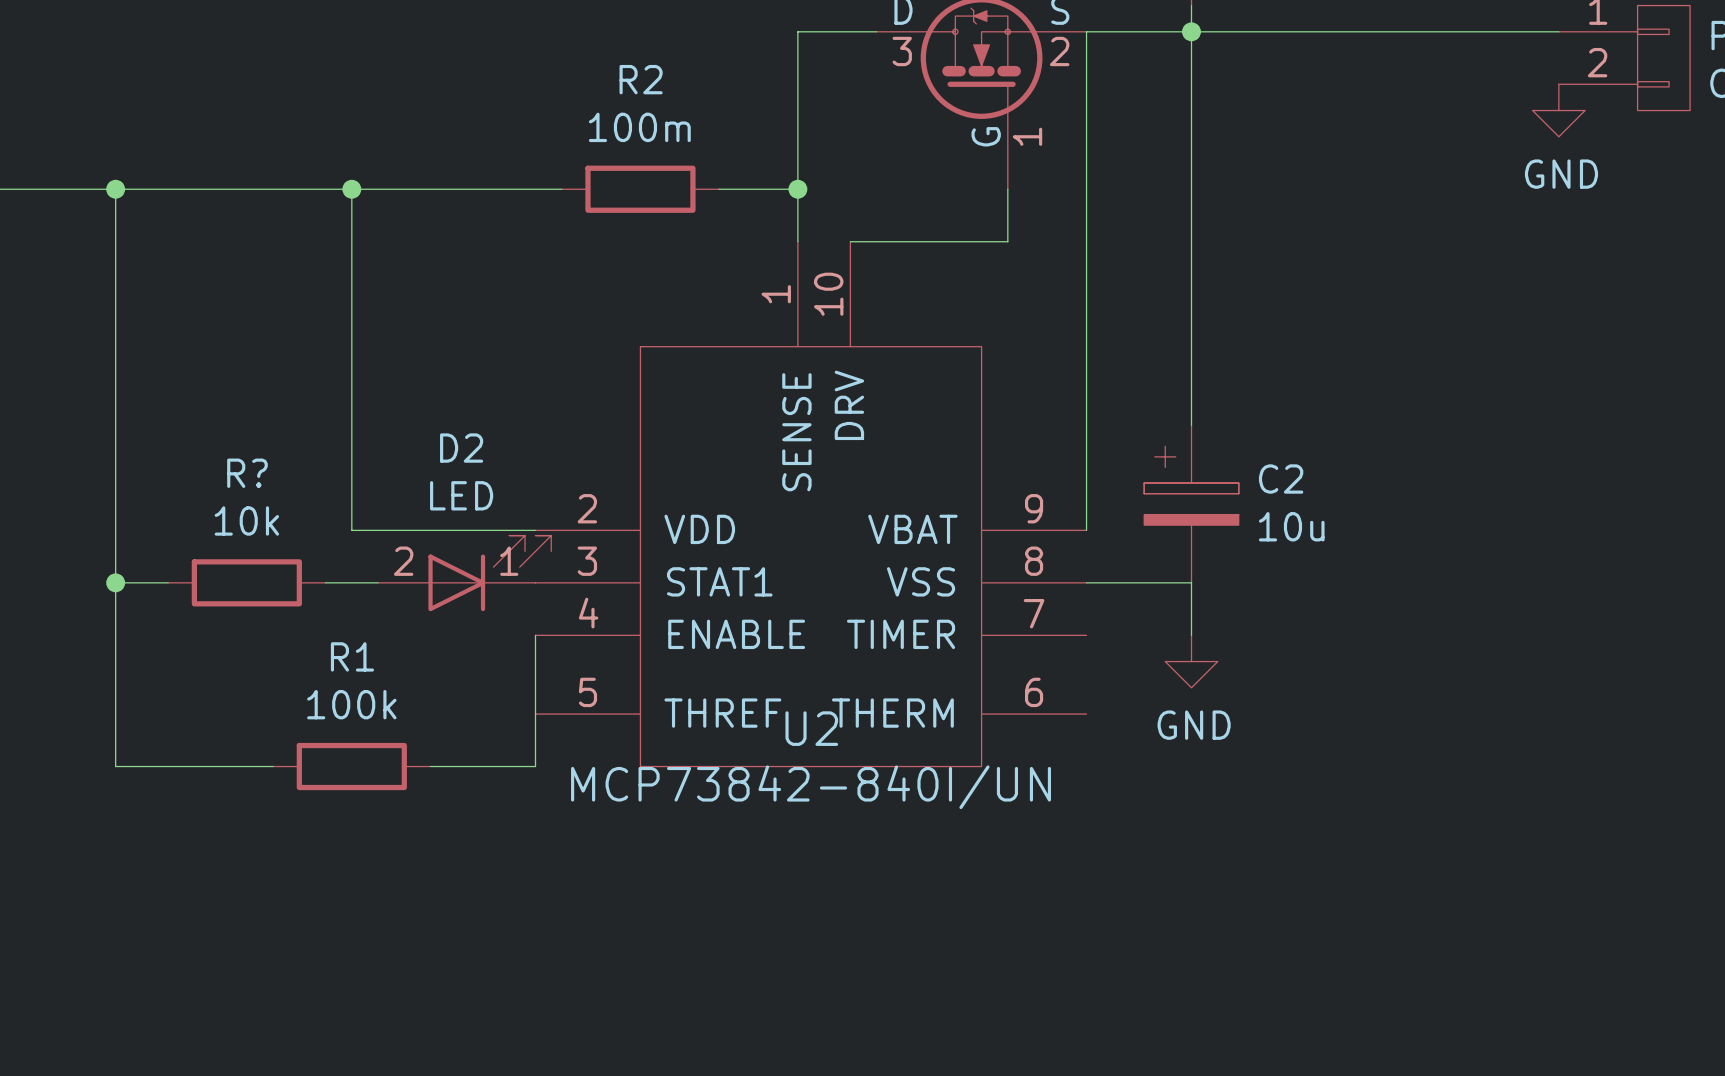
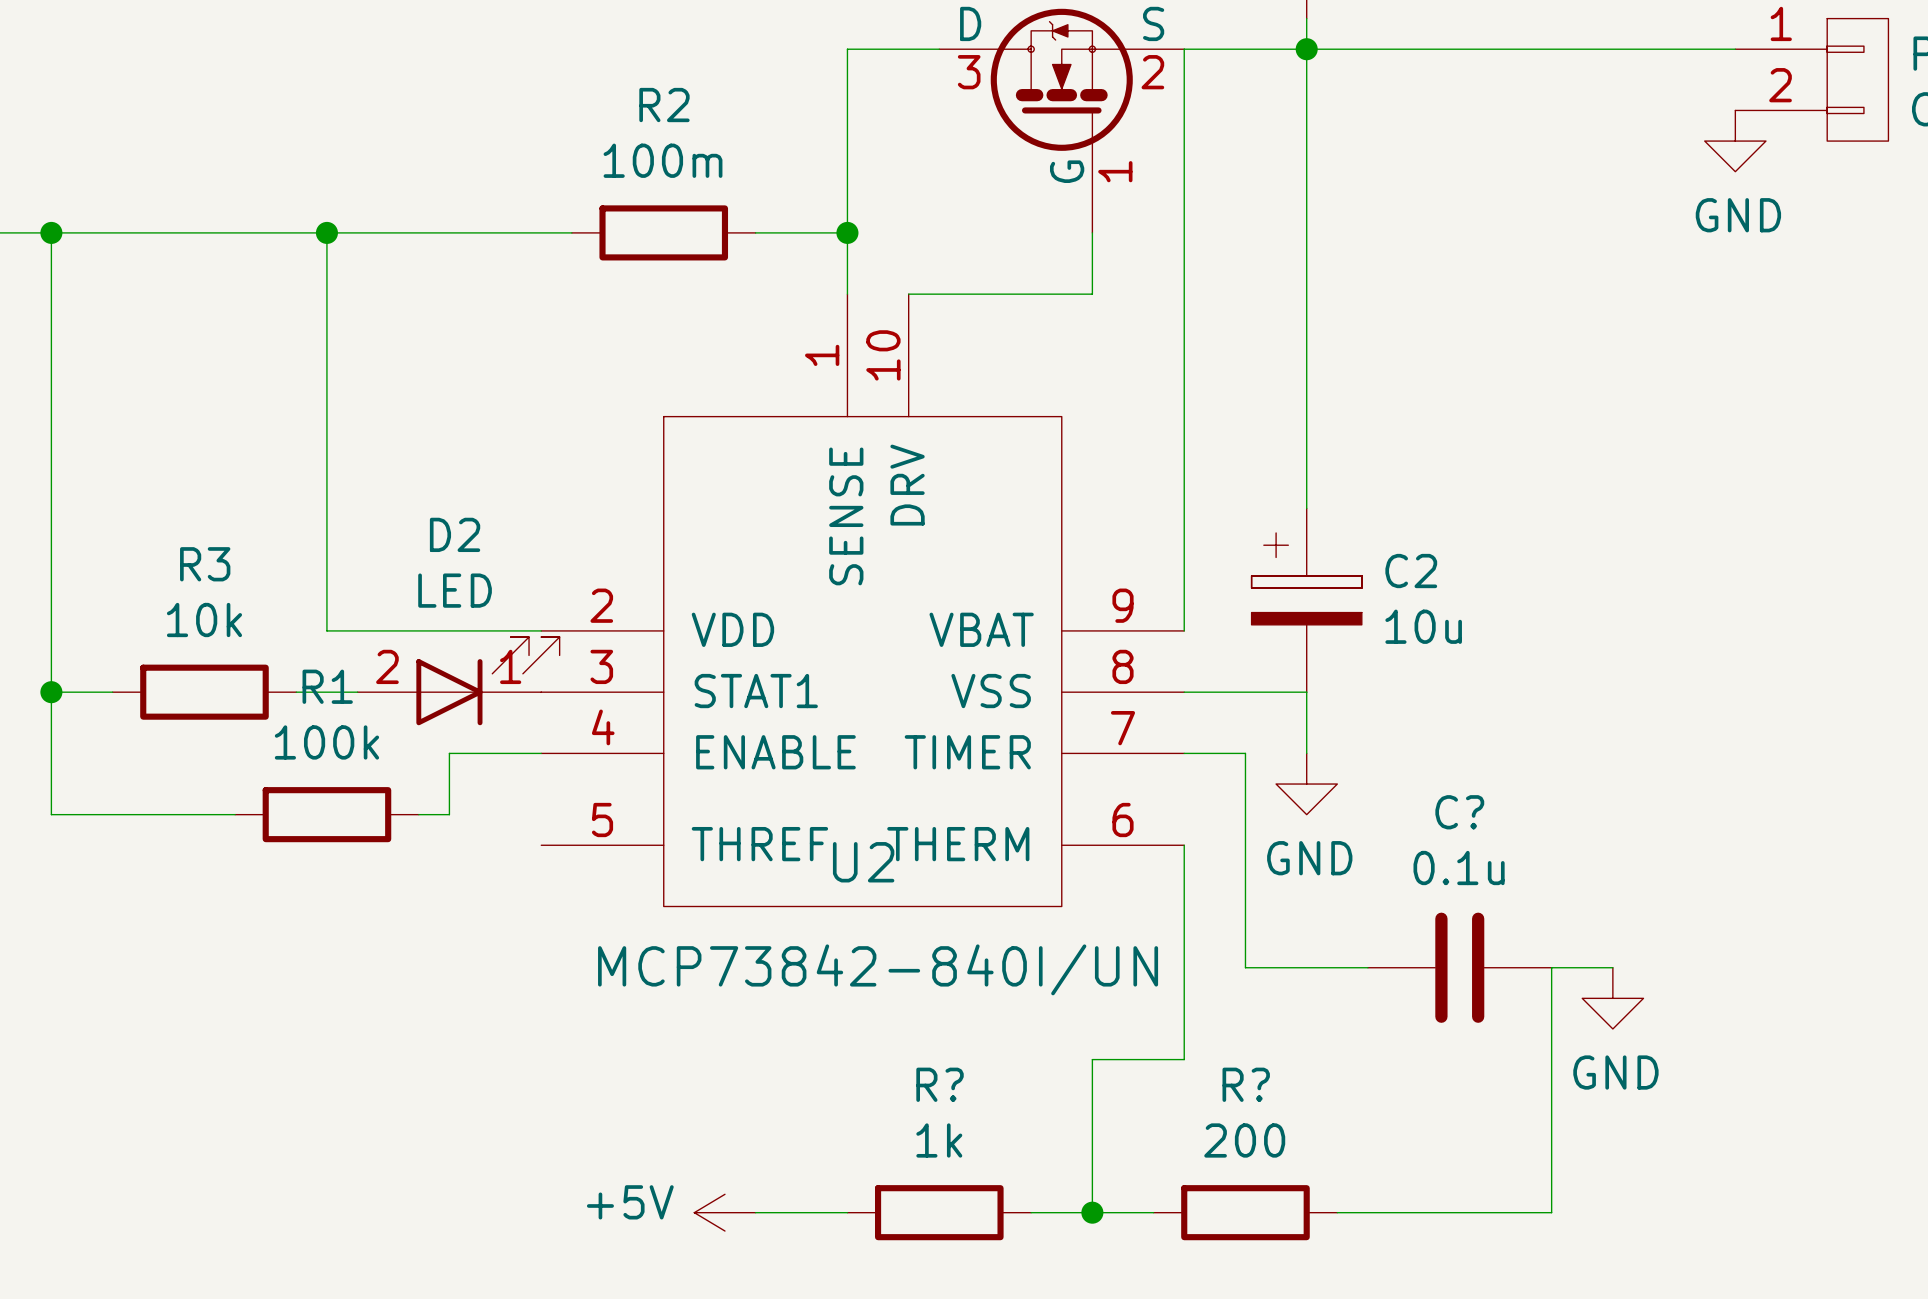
R? name: R? (247, 473) -> R3 (205, 564)
wire: (535, 635) (535, 766) (430, 766) -> (541, 753) (449, 753) (449, 814) (418, 814)
wire: none -> (1184, 753) (1245, 753) (1245, 967) (1367, 967)
wire: (115, 687) (115, 766) (273, 766) -> (51, 814) (235, 814)
wire: none -> (1184, 845) (1184, 1059) (1092, 1059) (1092, 1212)
R1 position: (351, 766) -> (326, 814)
U2 value position: MCP73842-840I/UN (811, 787) -> MCP73842-840I/UN (878, 969)
C?: none -> 0.1u (1459, 967)
wire: none -> (1612, 967) (1551, 967) (1551, 1212) (1337, 1212)
power symbol: none -> GND (1612, 998)
power symbol: none -> +5V (724, 1212)
wire: none -> (755, 1212) (847, 1212)
R?: none -> 1k (939, 1212)
wire: none -> (1031, 1212) (1153, 1212)
junction: none -> (1092, 1212)
R?: none -> 200 (1245, 1212)

